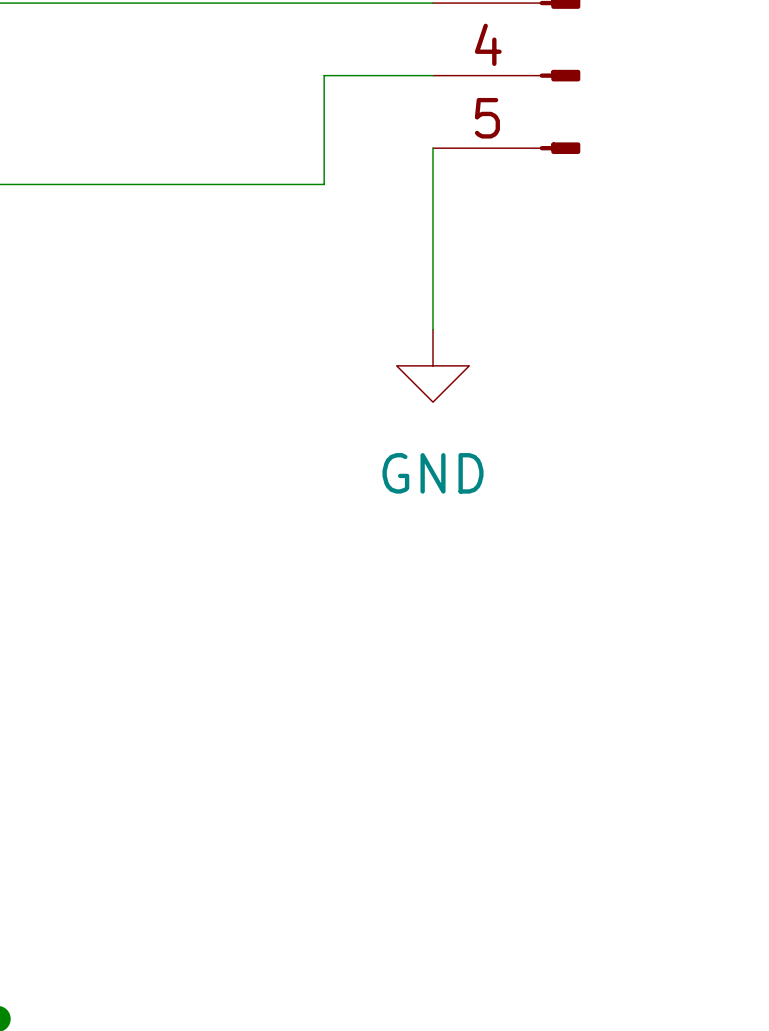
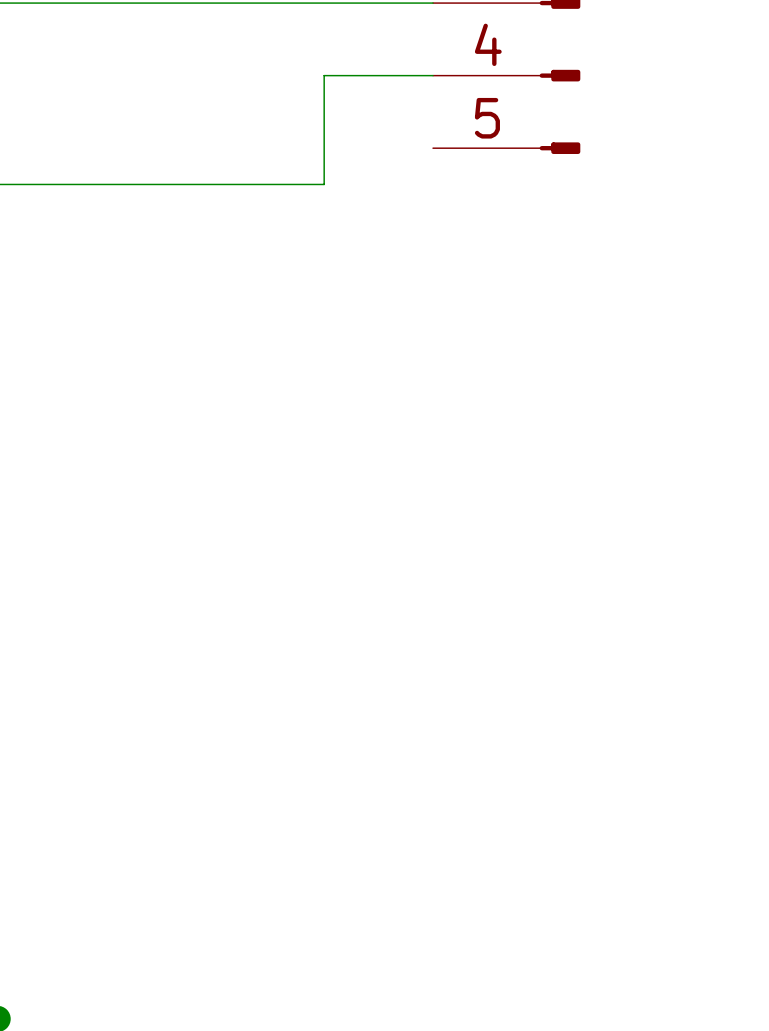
wire: (433, 148) (433, 329) -> none
power symbol: GND (433, 365) -> none

